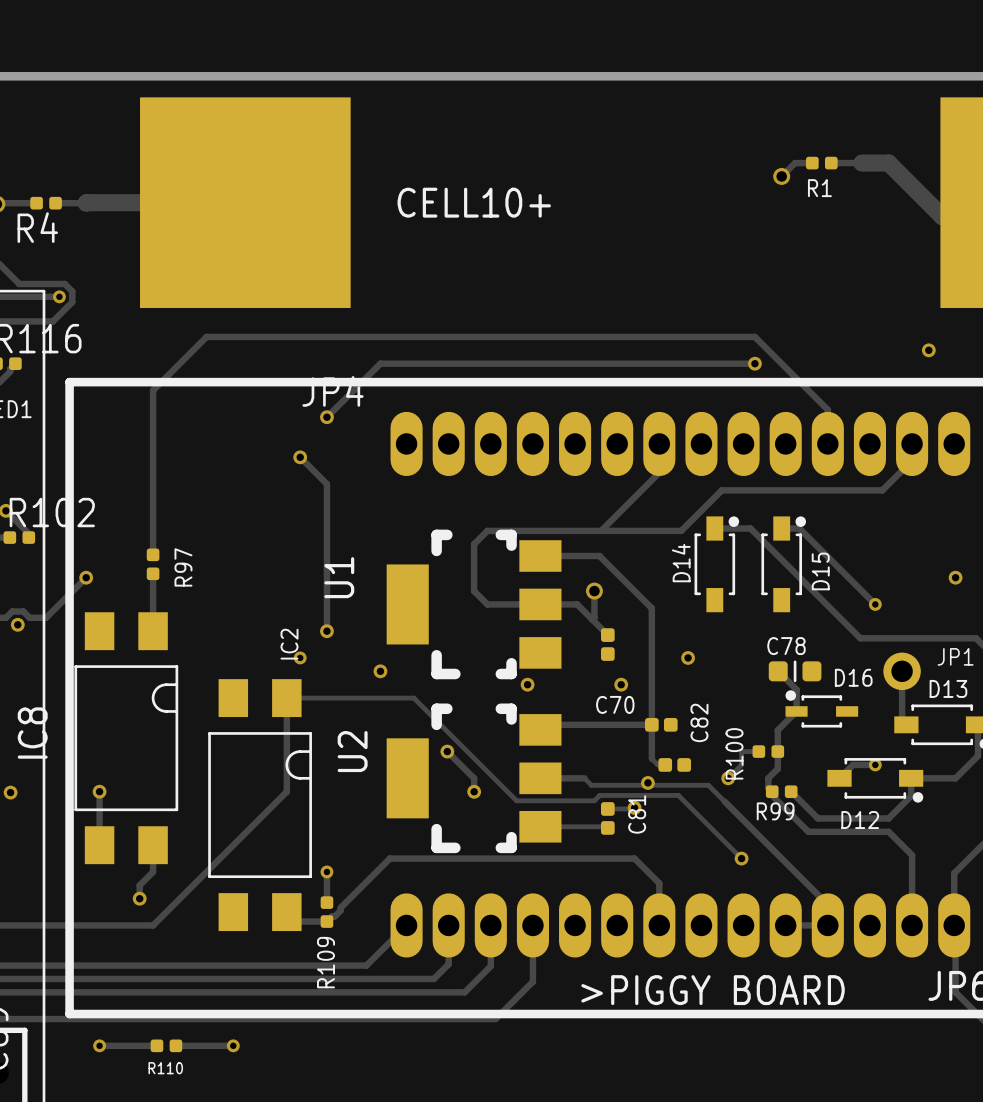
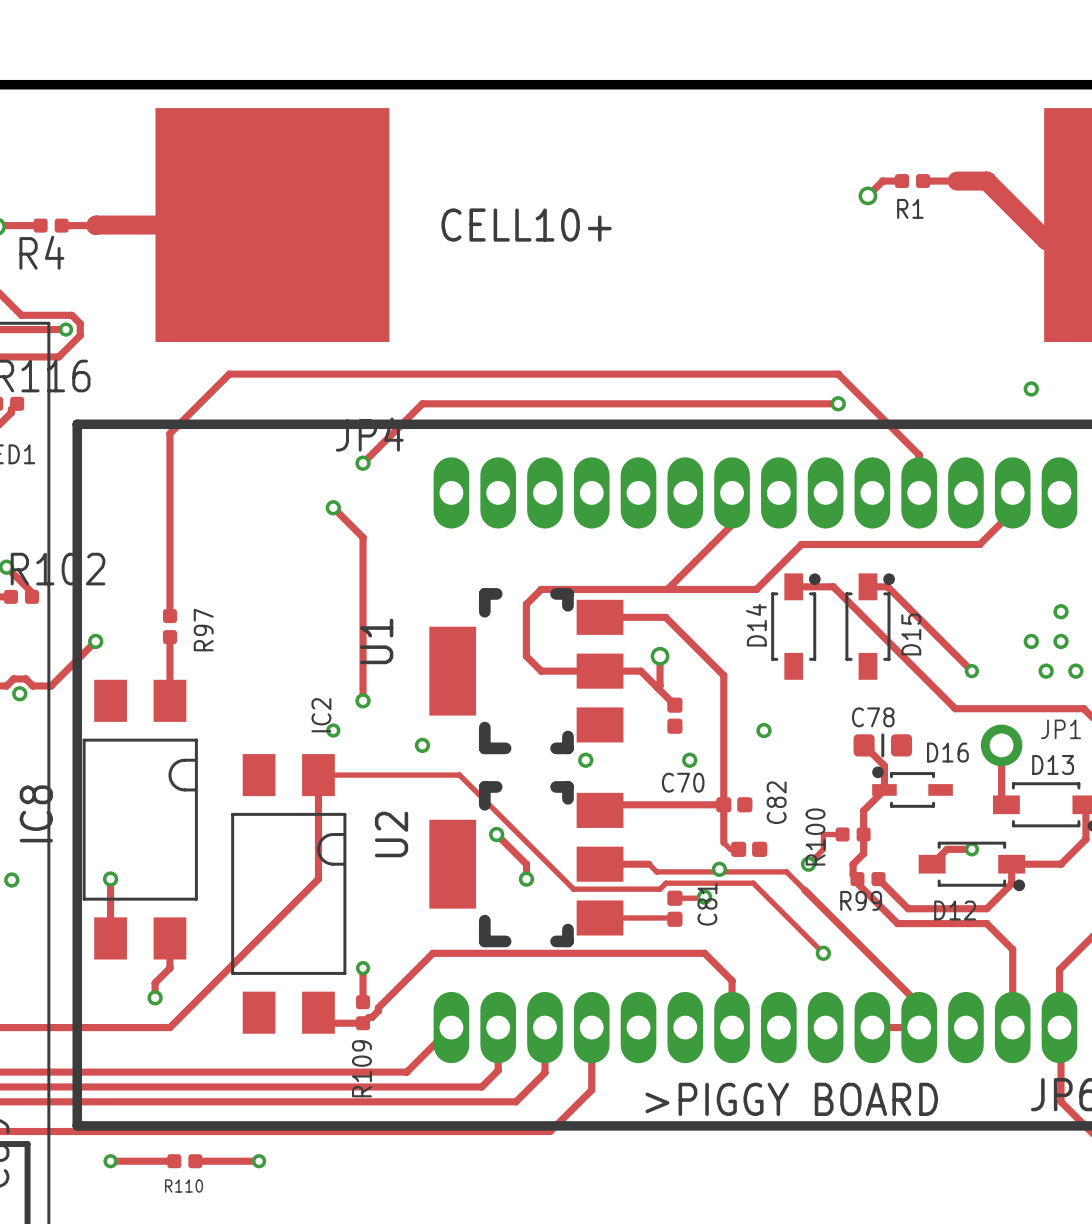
via: none -> (1061, 611)
via: none -> (1031, 641)
via: none -> (1046, 671)
via: none -> (1075, 671)

